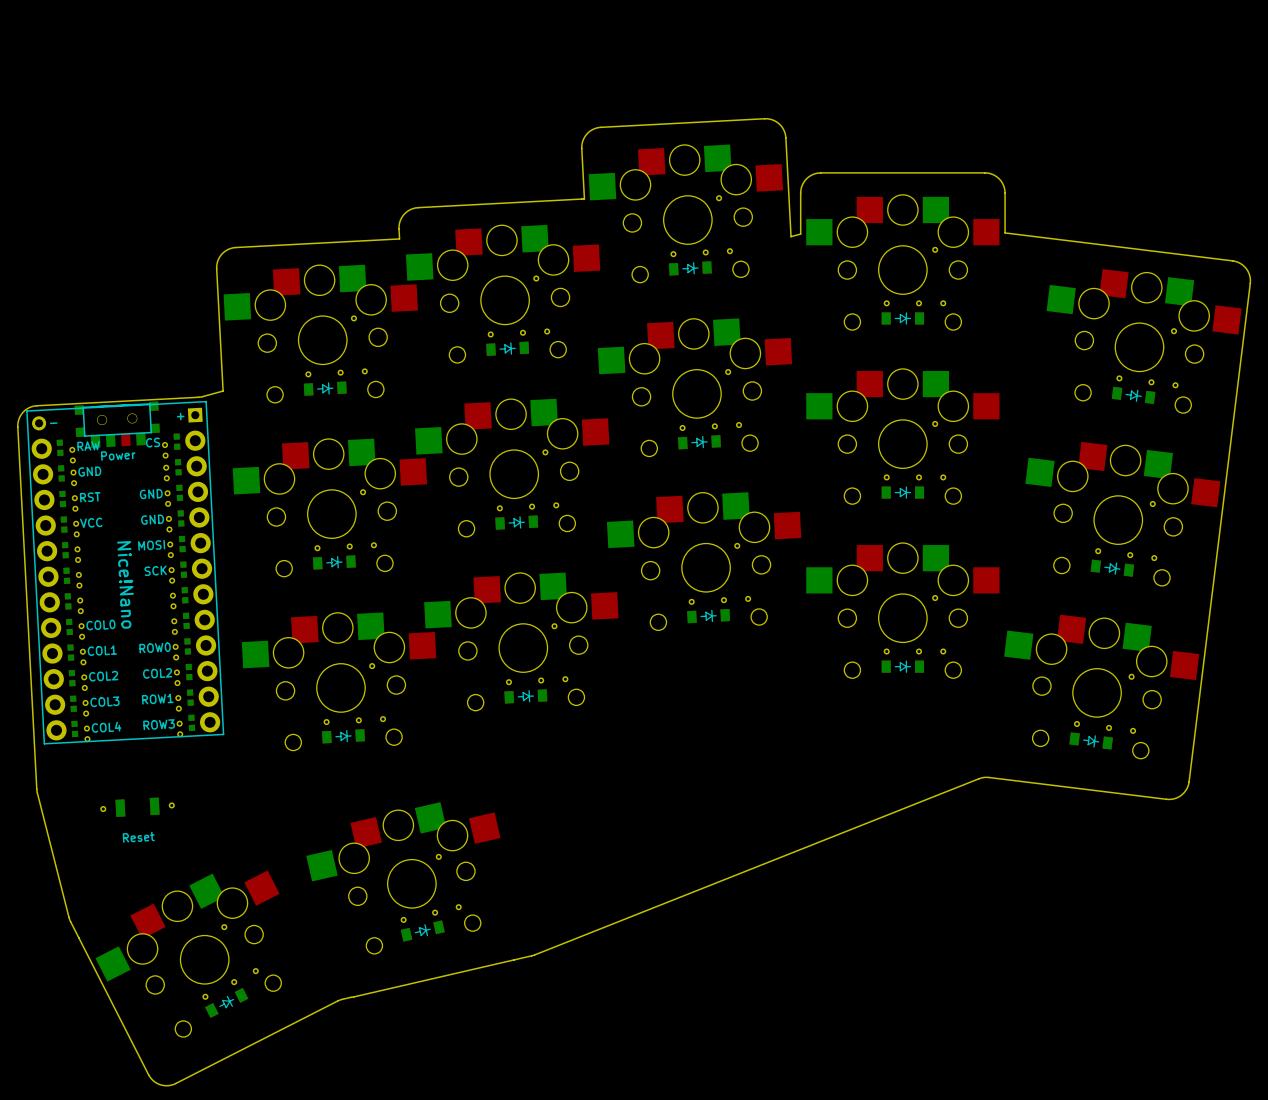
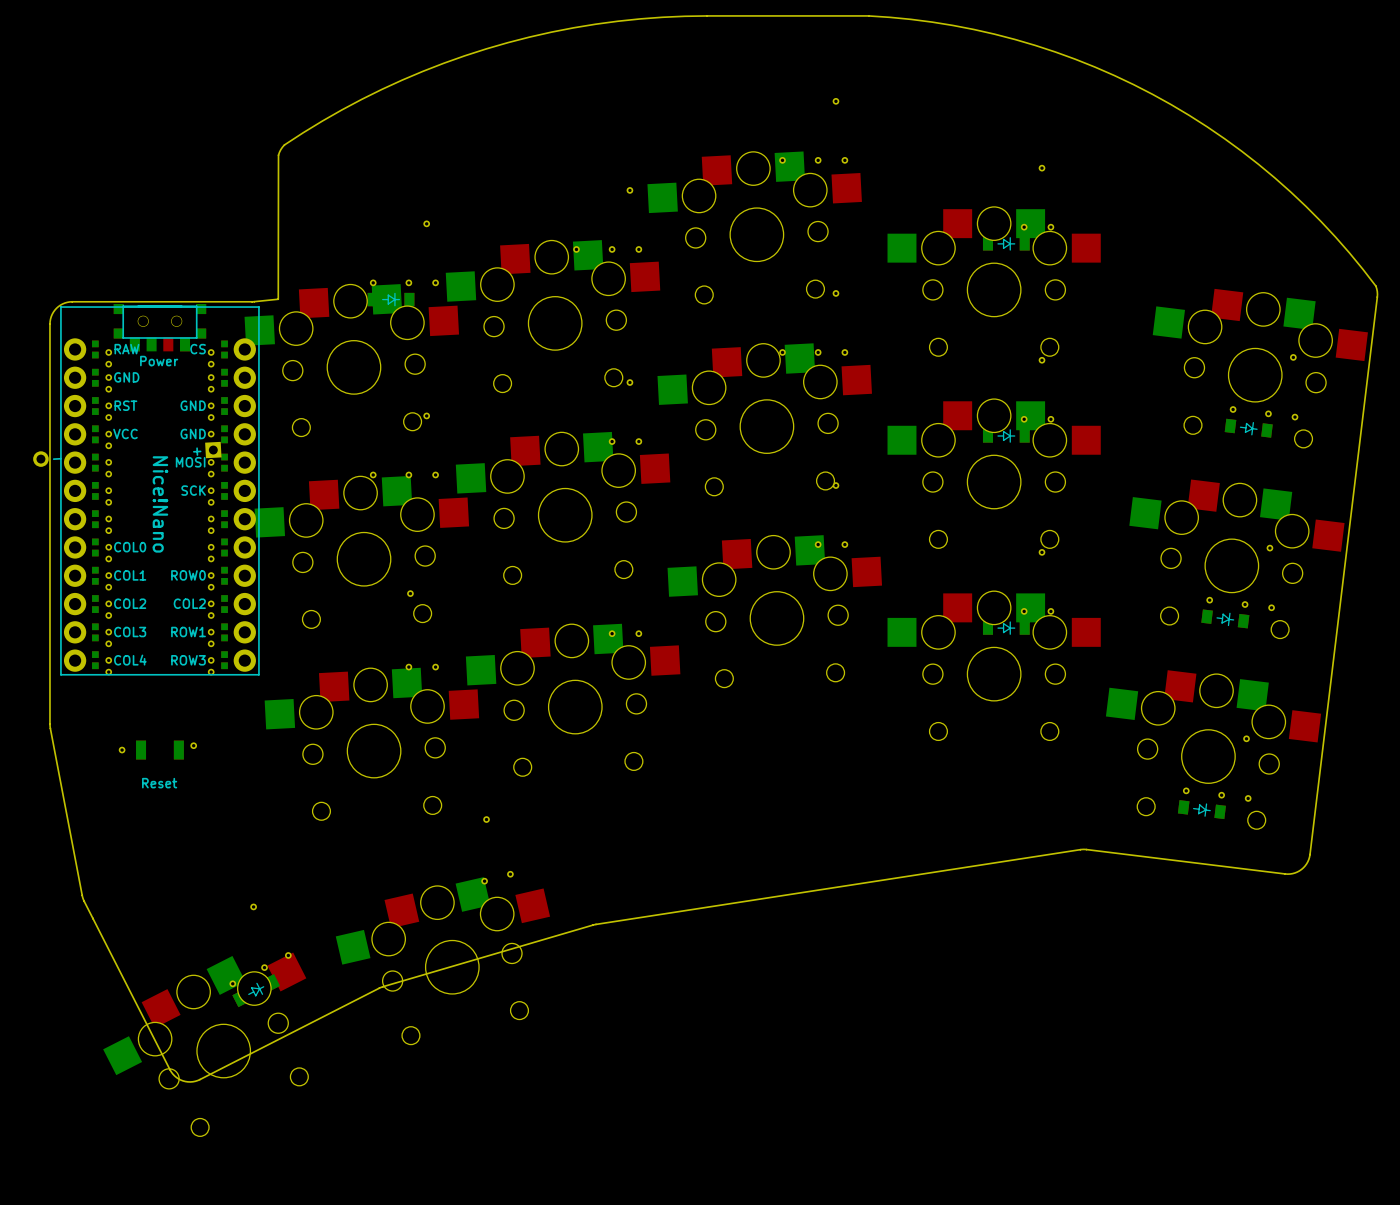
part: none -> (835, 101)
part: none -> (782, 160)
part: none -> (818, 160)
part: none -> (844, 160)
part: none -> (1041, 168)
part: none -> (629, 190)
part: (719, 198) -> none
part: none -> (426, 223)
part: none -> (1024, 227)
part: none -> (1050, 227)
part: none -> (1006, 243)
part: none -> (576, 249)
part: none -> (612, 249)
part: none -> (638, 249)
part: (935, 249) -> none
part: (729, 251) -> none
part: (705, 252) -> none
part: (673, 254) -> none
part: none -> (373, 282)
part: none -> (408, 282)
part: none -> (435, 282)
part: (690, 268) -> none
part: none -> (835, 293)
part: none -> (391, 299)
part: (536, 278) -> none
part: (886, 303) -> none
part: (919, 303) -> none
part: (943, 303) -> none
part: none -> (159, 327)
part: (353, 318) -> none
part: (902, 318) -> none
part: none -> (108, 352)
part: none -> (211, 352)
part: none -> (782, 352)
part: none -> (818, 352)
part: none -> (844, 352)
part: (547, 331) -> none
part: (522, 332) -> none
part: none -> (1041, 360)
part: (490, 334) -> none
part: none -> (108, 364)
part: none -> (211, 364)
part: (507, 348) -> none
part: none -> (108, 377)
part: none -> (211, 377)
part: none -> (629, 382)
part: none -> (108, 389)
part: none -> (211, 389)
part: (364, 371) -> none
part: (340, 372) -> none
part: (728, 372) -> none
part: (308, 374) -> none
part: none -> (108, 405)
part: none -> (211, 405)
part: none -> (426, 415)
part: none -> (108, 417)
part: none -> (211, 417)
part: none -> (1024, 419)
part: none -> (1050, 419)
part: (325, 388) -> none
part: none -> (108, 434)
part: none -> (211, 434)
part: none -> (1006, 435)
part: none -> (612, 441)
part: none -> (638, 441)
part: none -> (108, 445)
part: (935, 423) -> none
part: (117, 424) -> none
part: (739, 425) -> none
part: none -> (108, 462)
part: none -> (211, 462)
part: (714, 426) -> none
part: (682, 428) -> none
part: none -> (108, 474)
part: none -> (211, 474)
part: none -> (373, 474)
part: none -> (408, 474)
part: none -> (435, 474)
part: (699, 442) -> none
part: (165, 445) -> none
part: none -> (835, 485)
part: (72, 449) -> none
part: none -> (108, 490)
part: none -> (211, 490)
part: none -> (159, 490)
part: (545, 452) -> none
part: (165, 455) -> none
part: (72, 460) -> none
part: none -> (108, 502)
part: none -> (211, 502)
part: (166, 467) -> none
part: (73, 472) -> none
part: none -> (108, 518)
part: none -> (211, 518)
part: (886, 477) -> none
part: (919, 477) -> none
part: (943, 477) -> none
part: (166, 478) -> none
part: (74, 483) -> none
part: none -> (108, 530)
part: none -> (211, 530)
part: (363, 492) -> none
part: (902, 492) -> none
part: (167, 493) -> none
part: (74, 498) -> none
part: none -> (818, 544)
part: none -> (844, 544)
part: none -> (108, 547)
part: (168, 503) -> none
part: none -> (211, 547)
part: (556, 505) -> none
part: (532, 506) -> none
part: none -> (1041, 552)
part: (75, 508) -> none
part: (499, 508) -> none
part: none -> (108, 558)
part: none -> (211, 558)
part: (168, 518) -> none
part: (516, 522) -> none
part: (76, 523) -> none
part: none -> (108, 575)
part: none -> (211, 575)
part: (169, 529) -> none
part: (76, 534) -> none
part: none -> (108, 587)
part: none -> (211, 587)
part: (170, 544) -> none
part: (737, 545) -> none
part: (349, 546) -> none
part: (317, 548) -> none
part: (77, 549) -> none
part: none -> (108, 603)
part: none -> (211, 603)
part: (170, 555) -> none
part: (78, 559) -> none
part: none -> (1024, 611)
part: none -> (1050, 611)
part: (334, 562) -> none
part: none -> (108, 615)
part: none -> (211, 615)
part: (171, 570) -> none
part: (125, 572) -> none
part: (78, 574) -> none
part: none -> (1006, 628)
part: none -> (108, 632)
part: (172, 580) -> none
part: none -> (211, 632)
part: none -> (612, 633)
part: none -> (638, 633)
part: (79, 585) -> none
part: none -> (108, 643)
part: none -> (211, 643)
part: (172, 595) -> none
part: (748, 598) -> none
part: (935, 598) -> none
part: (80, 600) -> none
part: (723, 600) -> none
part: (691, 601) -> none
part: none -> (108, 660)
part: none -> (211, 660)
part: (173, 606) -> none
part: (80, 611) -> none
part: none -> (408, 667)
part: none -> (435, 667)
part: none -> (108, 672)
part: none -> (211, 672)
part: (708, 616) -> none
part: (174, 621) -> none
part: (81, 626) -> none
part: (554, 626) -> none
part: (174, 631) -> none
part: (82, 636) -> none
part: (175, 646) -> none
part: (82, 651) -> none
part: (886, 651) -> none
part: (919, 651) -> none
part: (943, 651) -> none
part: (176, 657) -> none
part: (83, 662) -> none
part: (372, 666) -> none
part: (902, 666) -> none
part: (176, 672) -> none
part: (84, 677) -> none
part: (565, 679) -> none
part: (541, 680) -> none
part: (508, 682) -> none
part: (84, 687) -> none
part: none -> (122, 750)
part: none -> (159, 750)
part: (525, 696) -> none
part: (178, 698) -> none
part: (85, 702) -> none
part: (178, 708) -> none
part: (86, 713) -> none
part: (383, 719) -> none
part: (358, 720) -> none
part: (326, 722) -> none
part: (179, 723) -> none
part: (86, 728) -> none
part: (180, 734) -> none
part: (343, 736) -> none
part: (87, 739) -> none
part: none -> (486, 819)
board edge: (988, 777) (979, 778) (533, 955) (339, 1000) (175, 1083) (168, 1085) (160, 1084) (153, 1080) (148, 1074) (69, 919) (37, 792) (17, 426) (18, 419) (24, 410) (34, 406) (198, 397) (223, 391) (216, 266) (220, 256) (225, 250) (235, 247) (399, 238) (399, 226) (401, 218) (406, 212) (415, 207) (584, 199) (582, 143) (588, 132) (598, 127) (764, 118) (774, 120) (782, 127) (785, 135) (791, 236) (800, 234) (802, 185) (806, 178) (815, 173) (990, 173) (999, 178) (1004, 187) (1005, 232) (1232, 260) (1244, 266) (1249, 275) (1250, 283) (1189, 781) (1186, 789) (1181, 795) (1174, 798) (1166, 799) -> (1089, 849) (1080, 849) (594, 924) (381, 987) (200, 1079) (190, 1081) (180, 1079) (170, 1069) (83, 898) (50, 728) (49, 324) (52, 314) (58, 306) (69, 301) (252, 301) (278, 299) (278, 155) (284, 144) (361, 99) (422, 71) (486, 48) (551, 32) (617, 21) (684, 16) (889, 17) (952, 25) (1014, 39) (1075, 59) (1114, 75) (1189, 115) (1258, 164) (1320, 221) (1349, 252) (1376, 288) (1377, 297) (1310, 854) (1306, 863) (1301, 869) (1295, 872) (1285, 873)
part: none -> (510, 874)
part: (171, 805) -> none
part: none -> (484, 881)
part: (137, 807) -> none
part: (103, 809) -> none
part: none -> (253, 906)
part: (438, 856) -> none
part: none -> (288, 955)
part: none -> (264, 967)
part: none -> (232, 983)
part: (458, 907) -> none
part: (435, 912) -> none
part: (403, 919) -> none
part: (224, 927) -> none
part: (422, 931) -> none
part: (255, 971) -> none
part: (234, 982) -> none
part: (205, 996) -> none
part position: (226, 1002) -> (256, 990)

